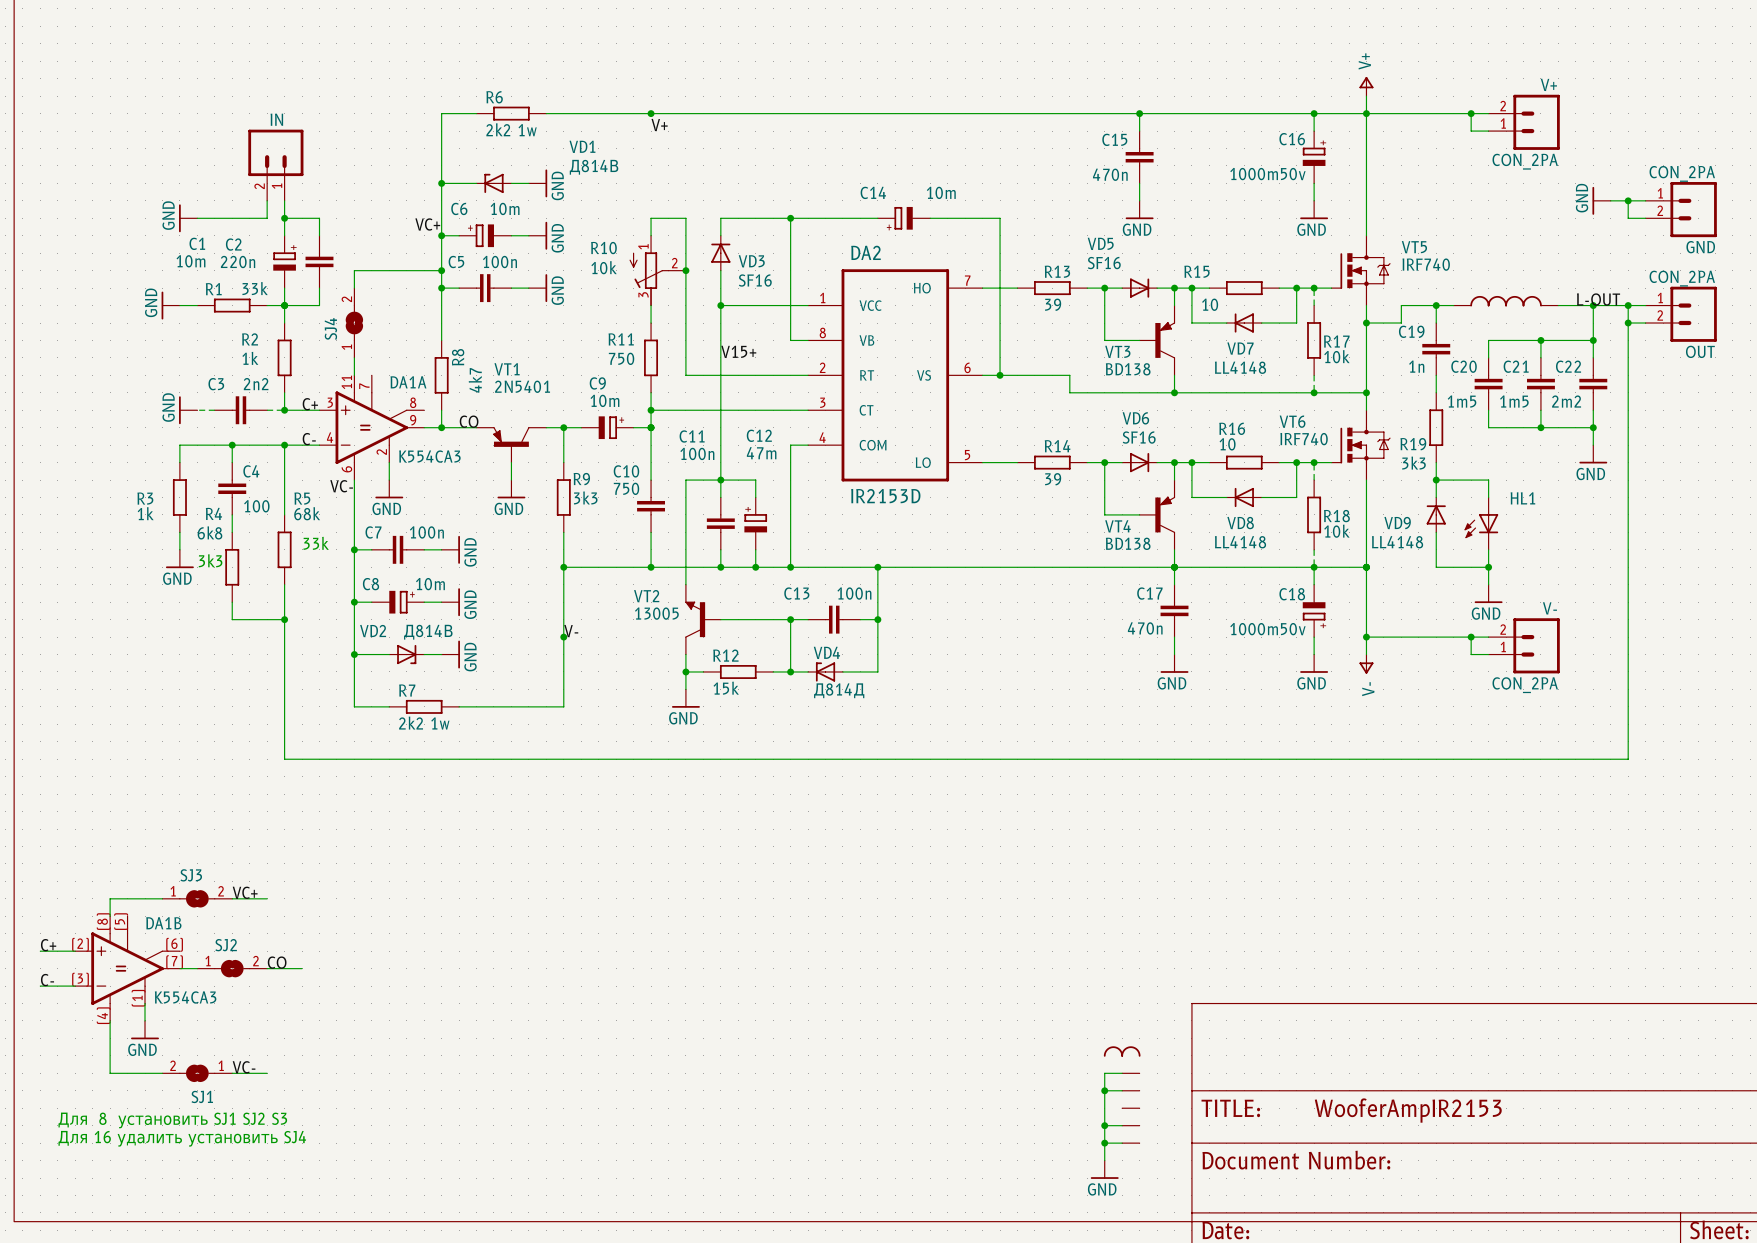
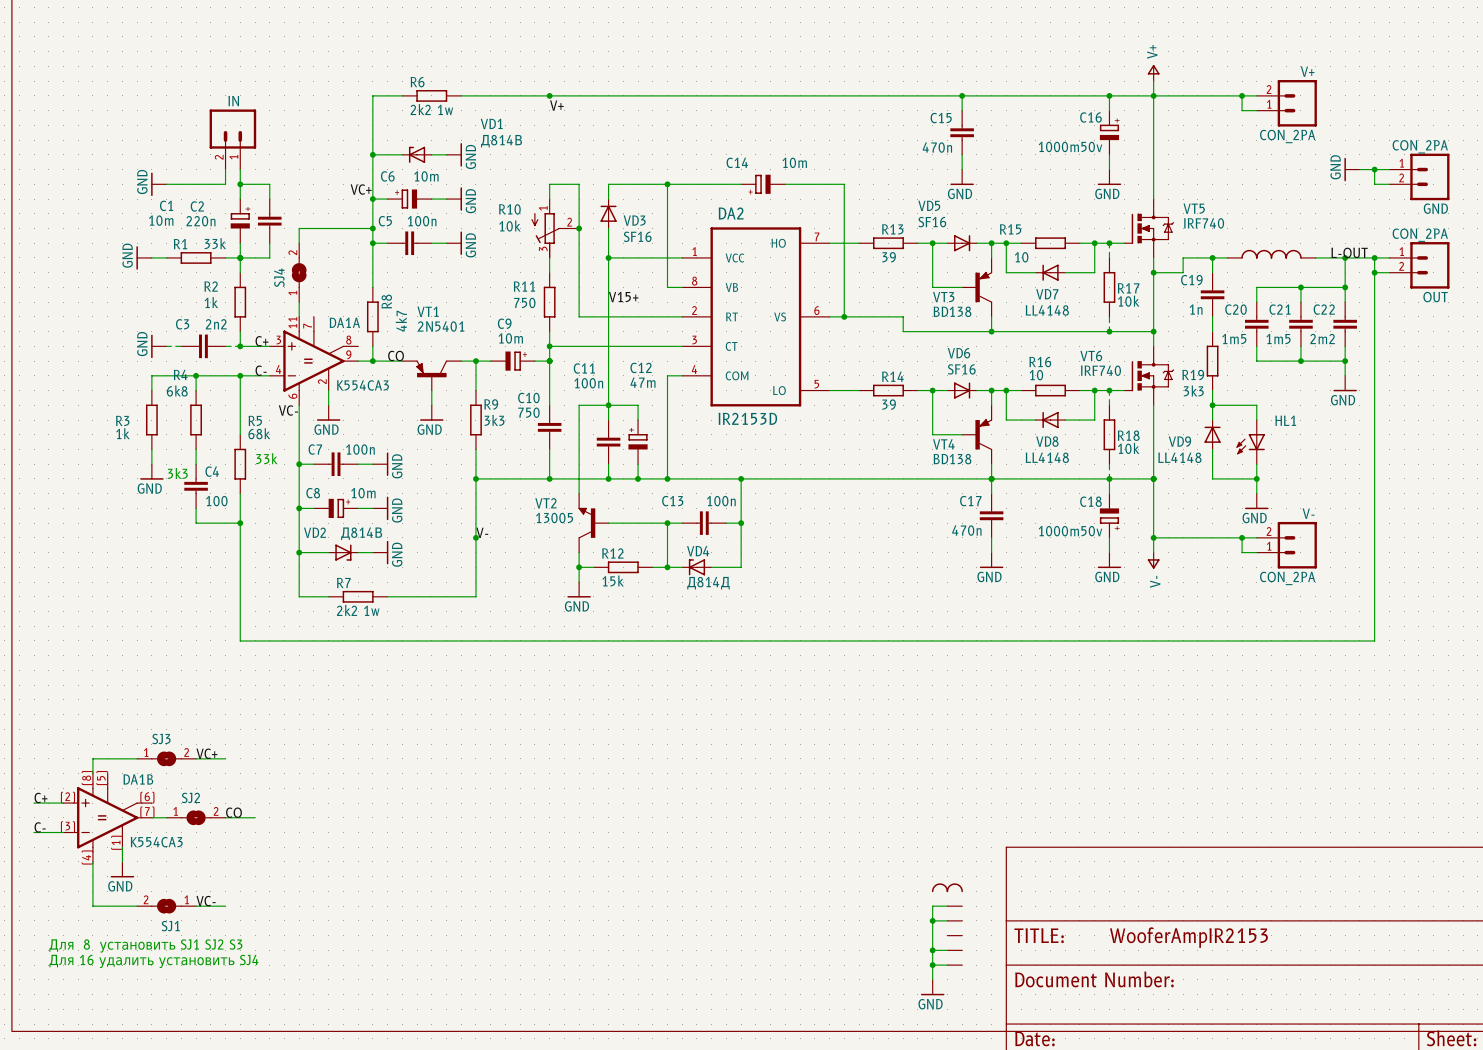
C4 position: (232, 488) -> (196, 486)
R4 position: (232, 567) -> (196, 420)

